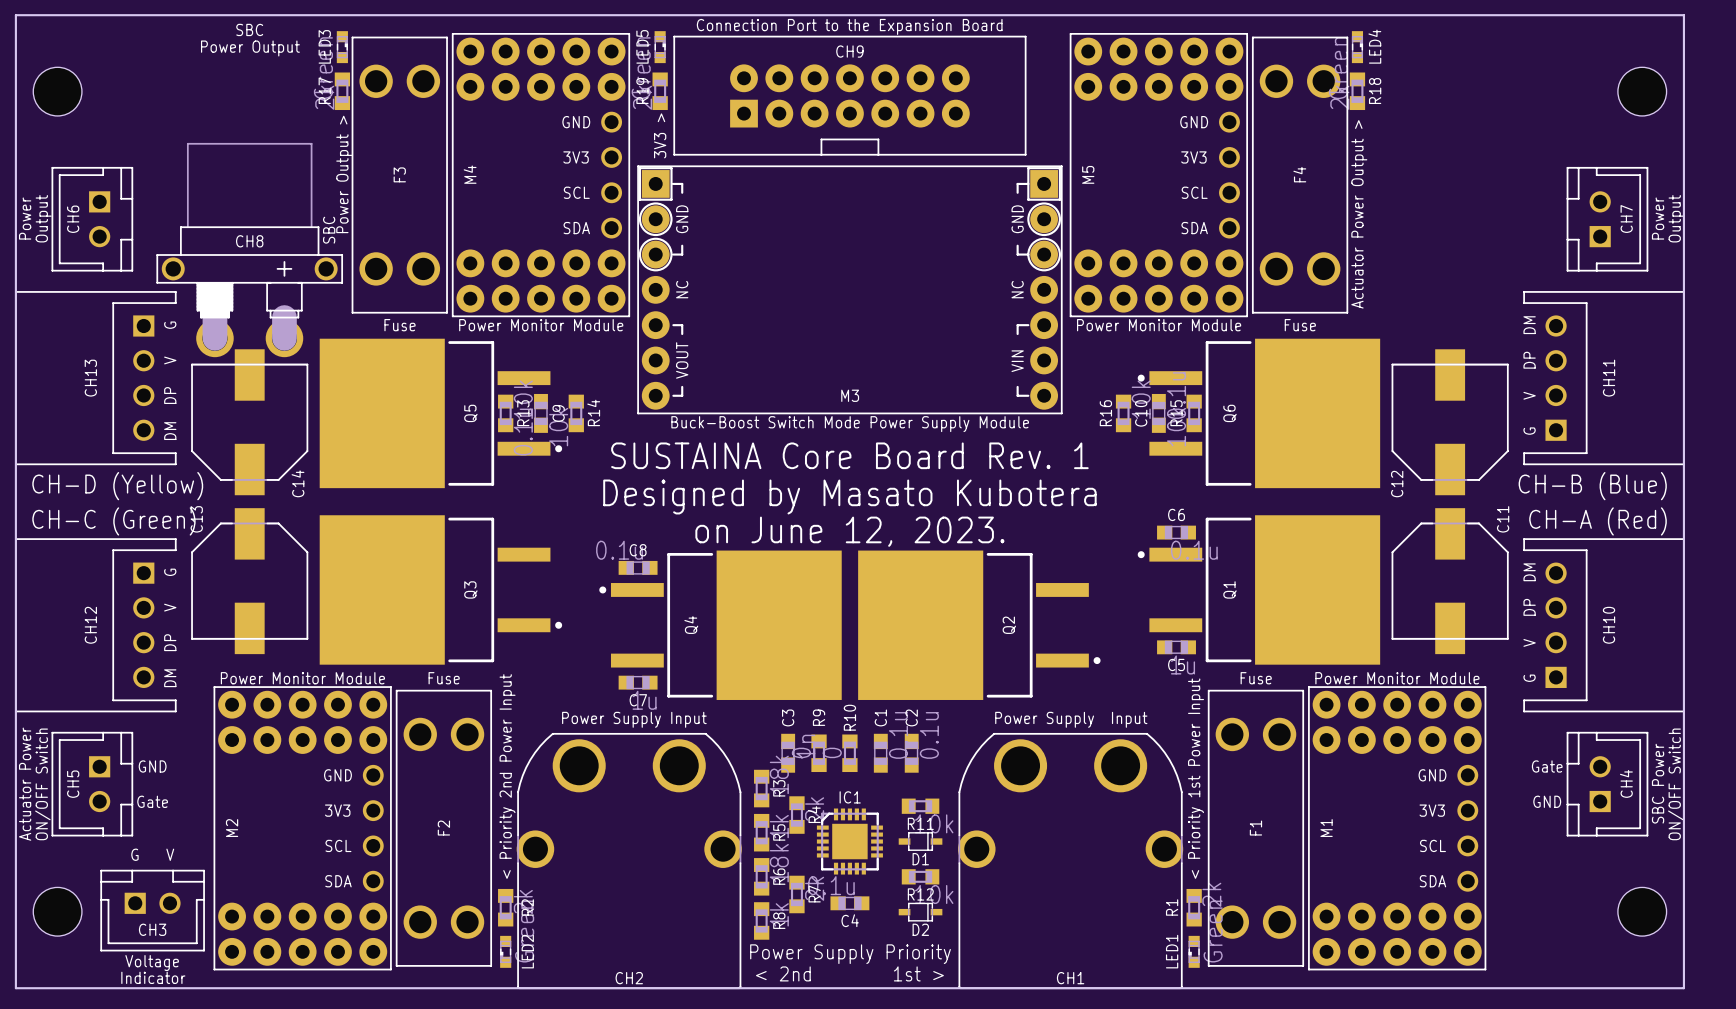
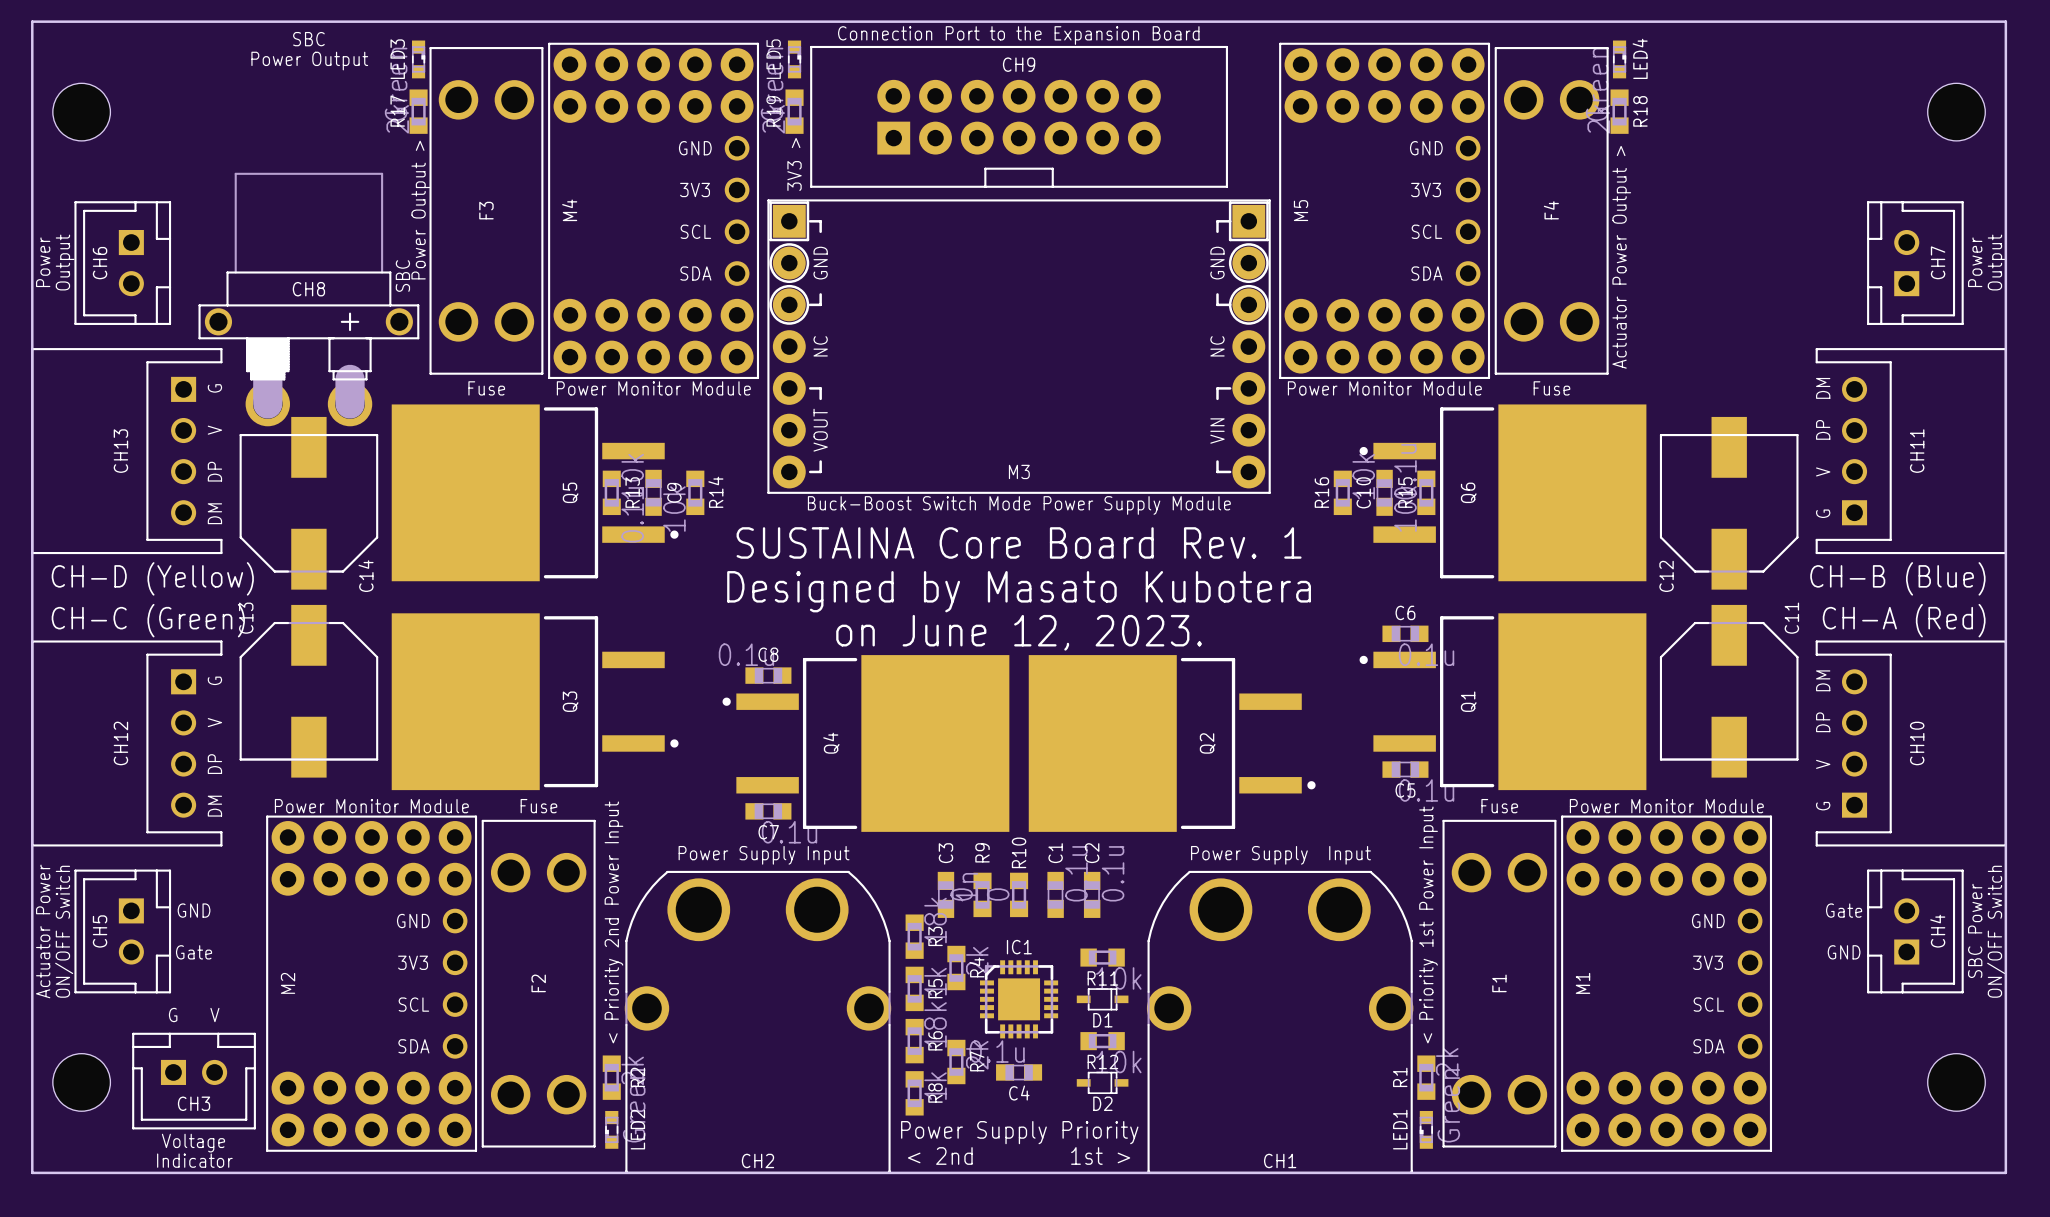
C5 value: 1u (1182, 664) -> 0.1u (1426, 790)
C7 value: 1u (644, 700) -> 0.1u (789, 832)

